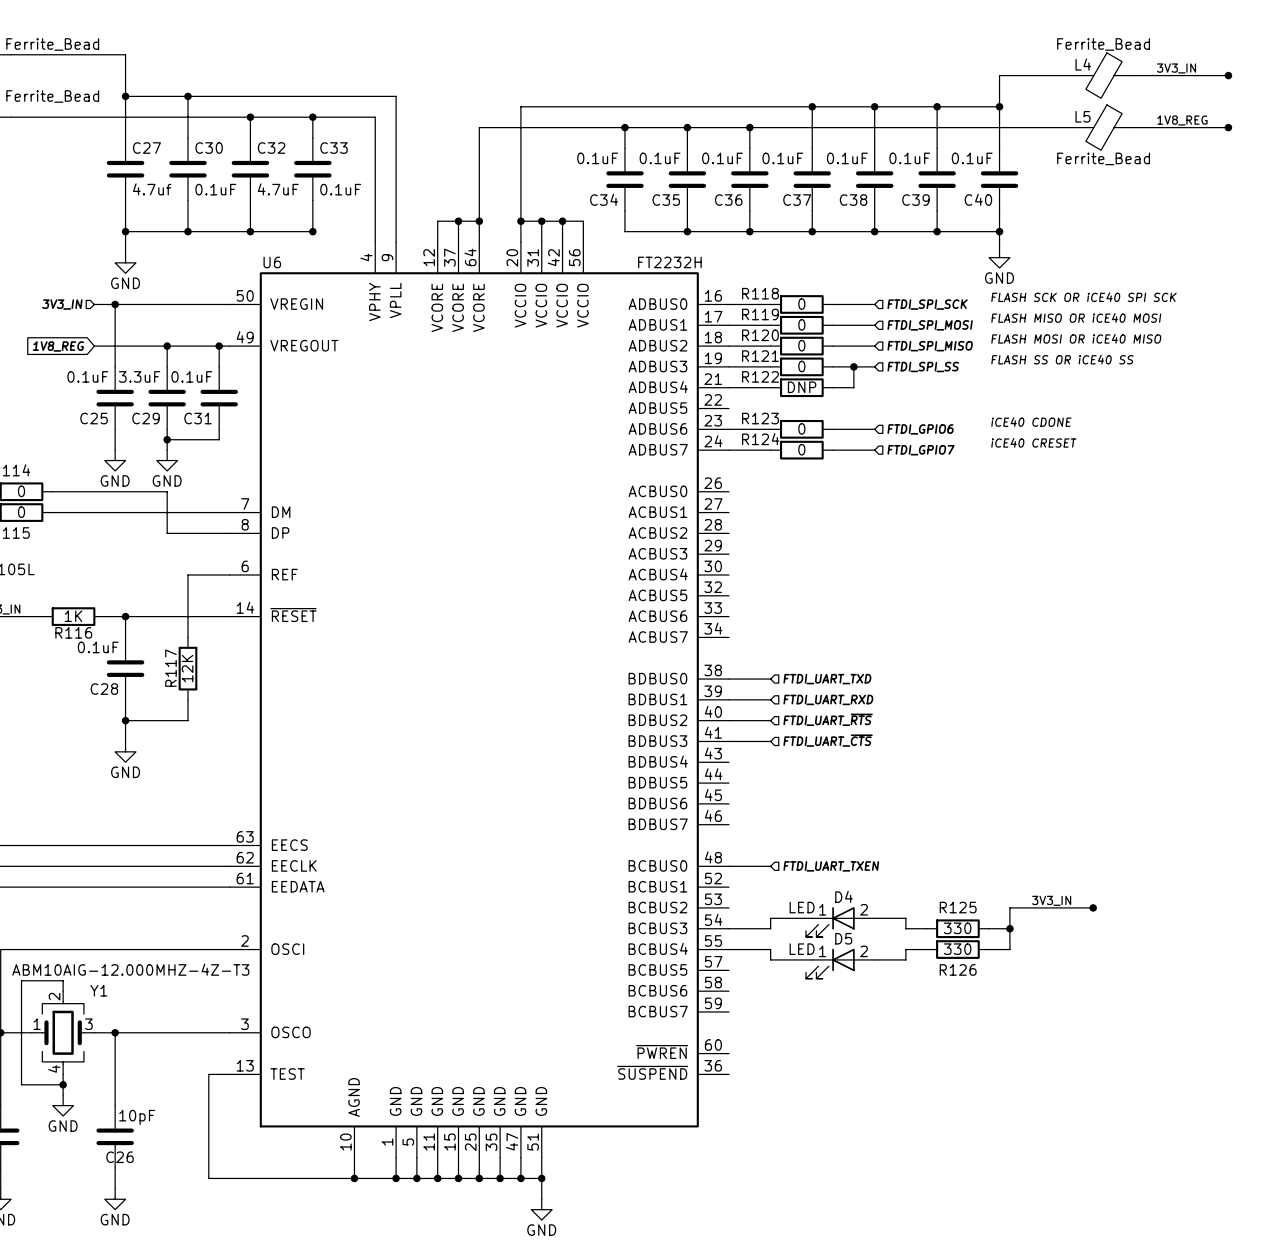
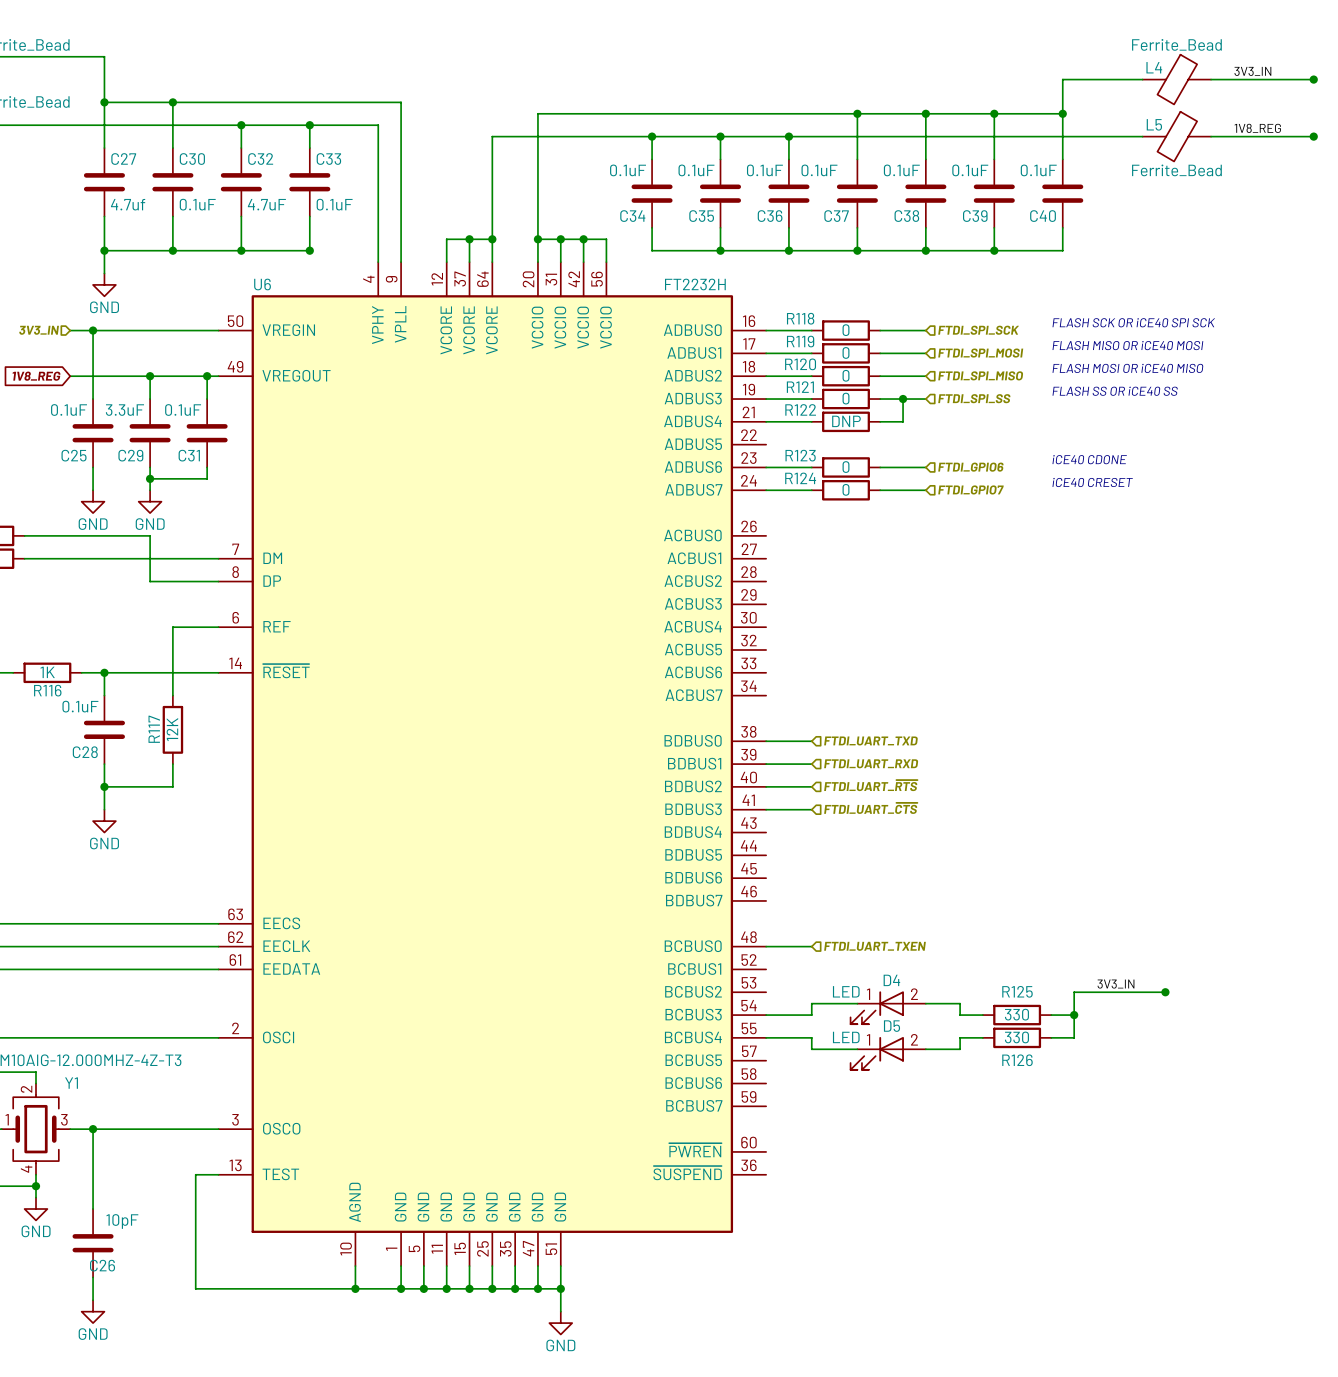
wire: (999, 231) (999, 247) -> none
junction: (999, 231) -> none
power symbol: GND (999, 257) -> none

